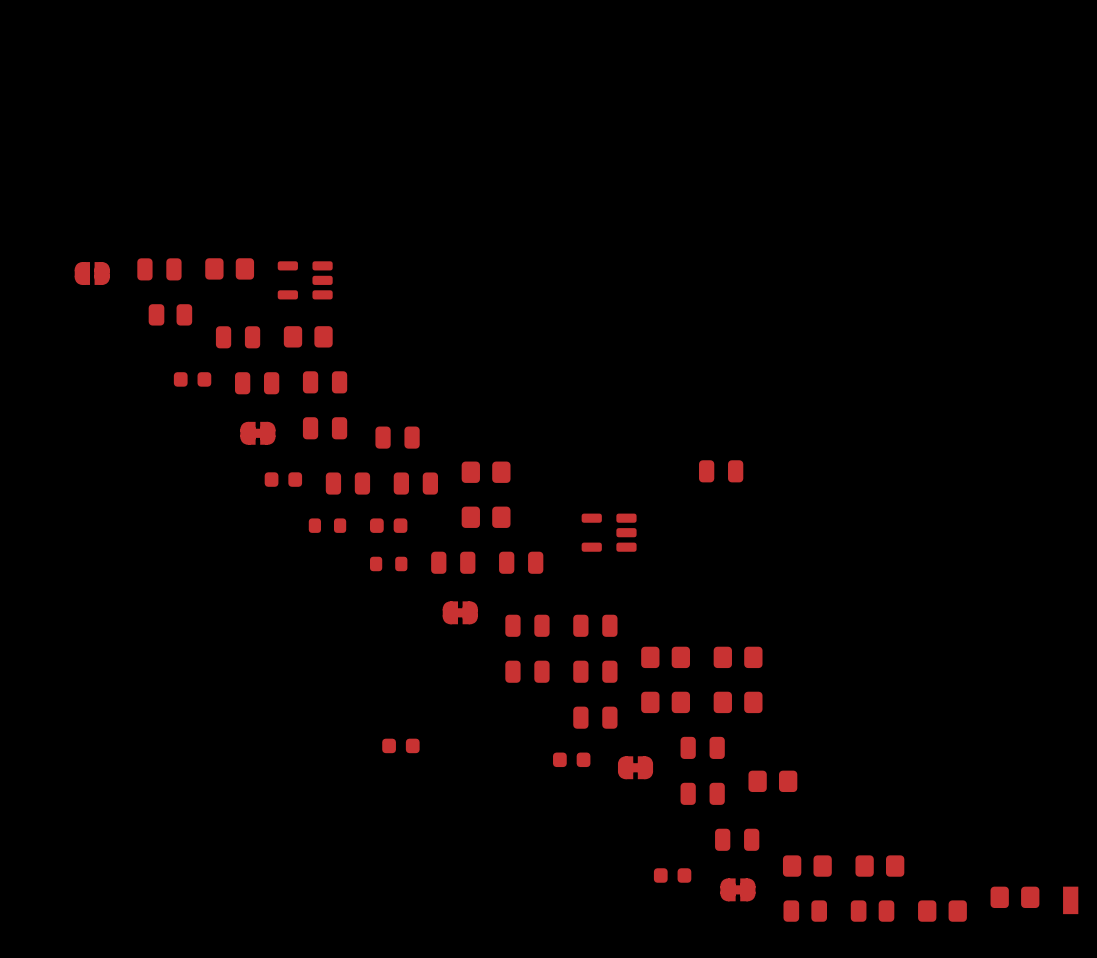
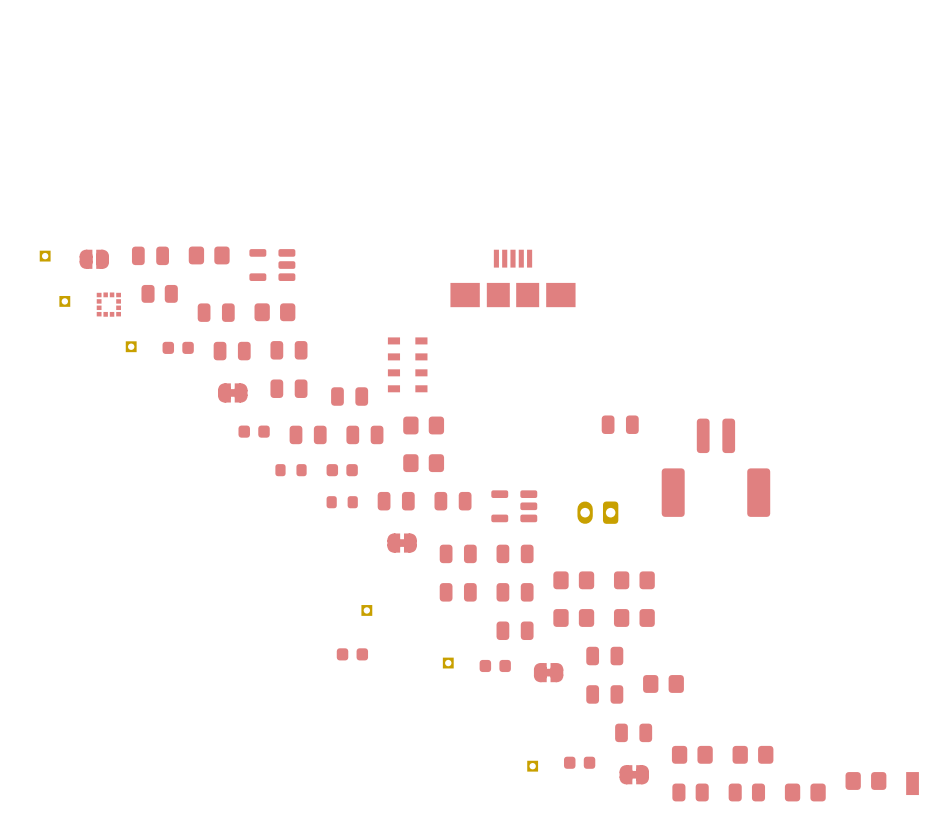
part: none -> (45, 256)
part: none -> (512, 278)
part: none -> (64, 301)
part: none -> (108, 304)
part: none -> (131, 346)
part: none -> (407, 364)
part: none -> (715, 467)
part position: (609, 532) -> (514, 506)
part: none -> (597, 512)
part: none -> (366, 610)
part: none -> (448, 663)
part: none -> (532, 766)

